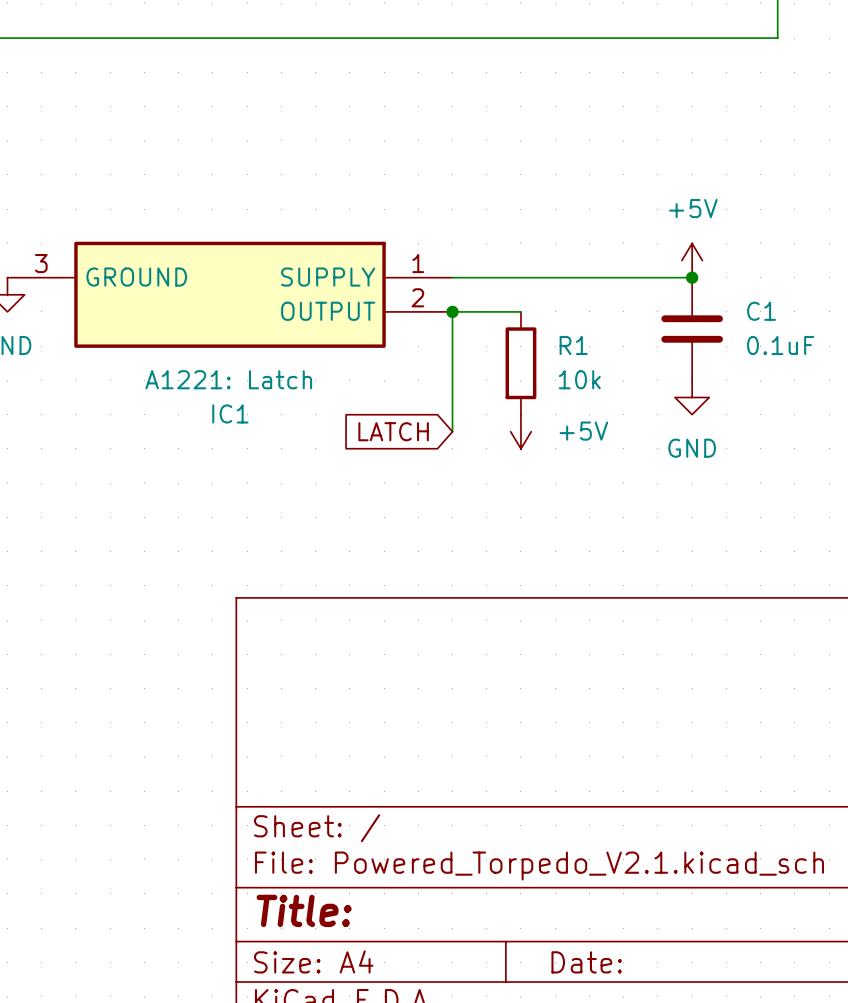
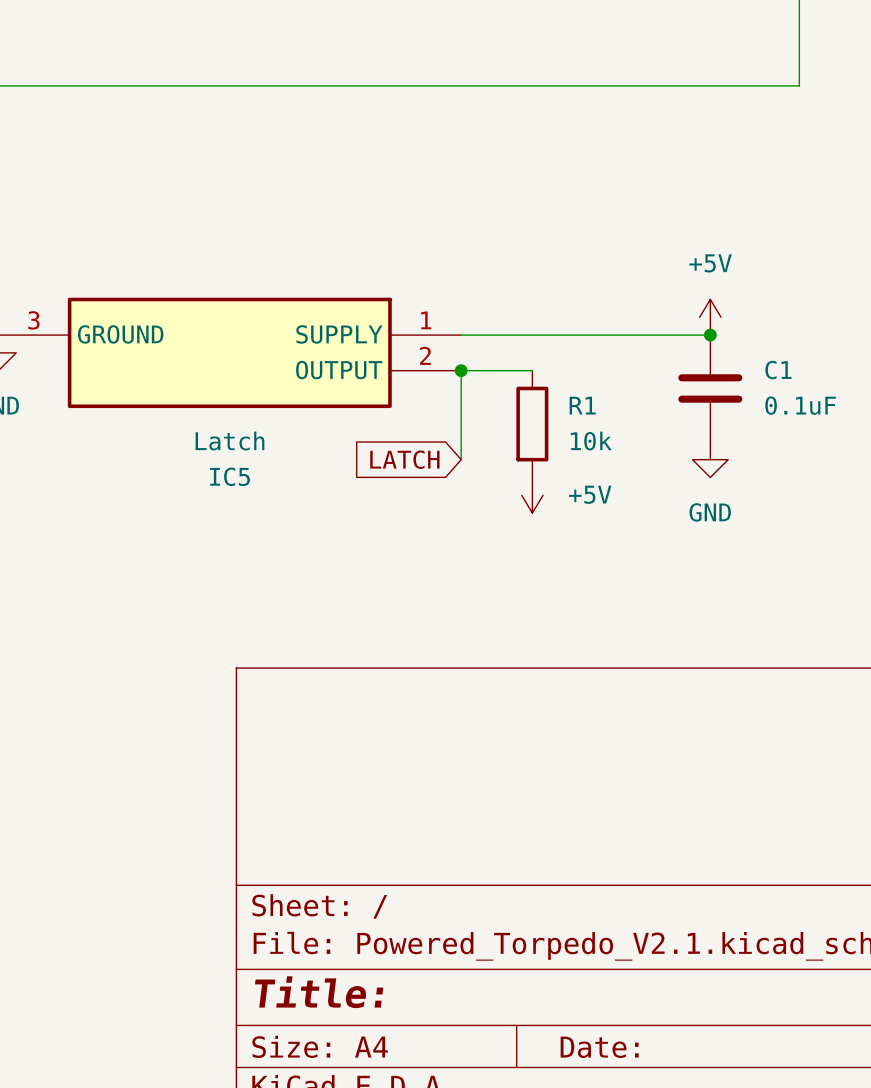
IC1 value: A1221: Latch (228, 379) -> Latch (229, 441)
wire: (452, 397) (452, 431) -> none
IC1 name: IC1 (230, 413) -> IC5 (230, 476)
global label position: LATCH (393, 431) -> LATCH (404, 459)

